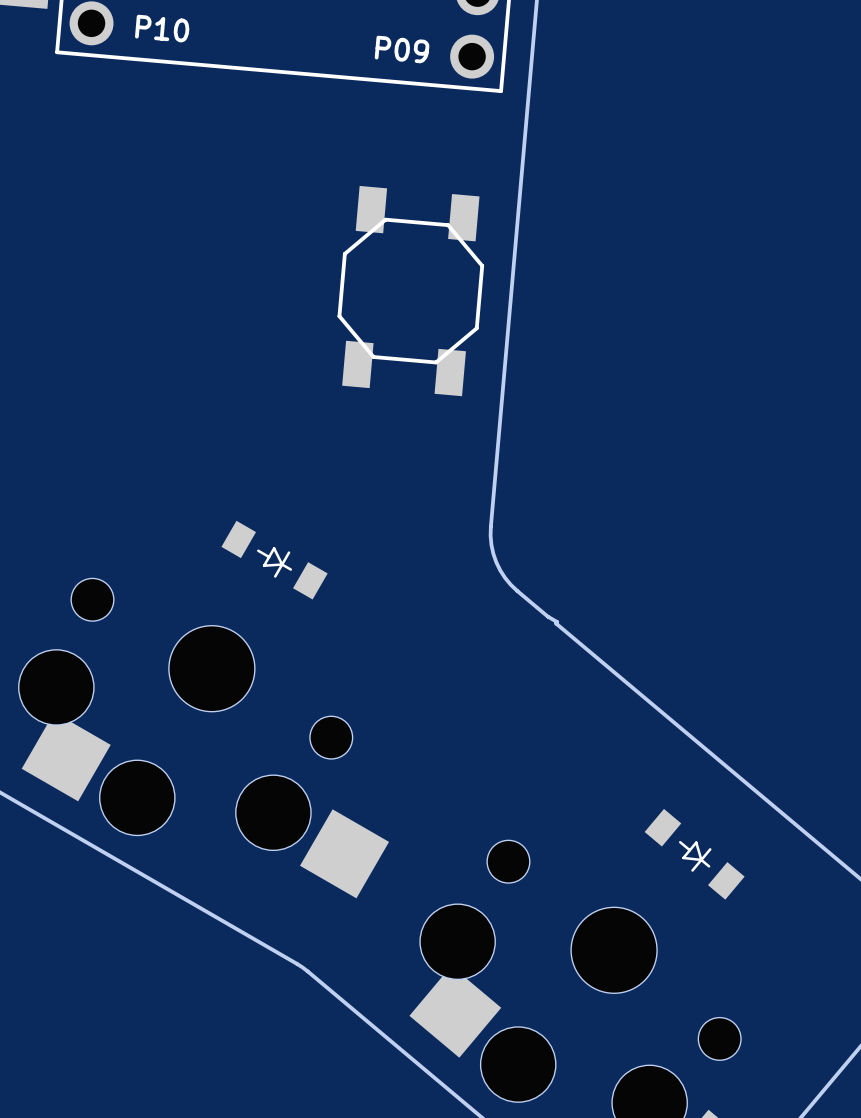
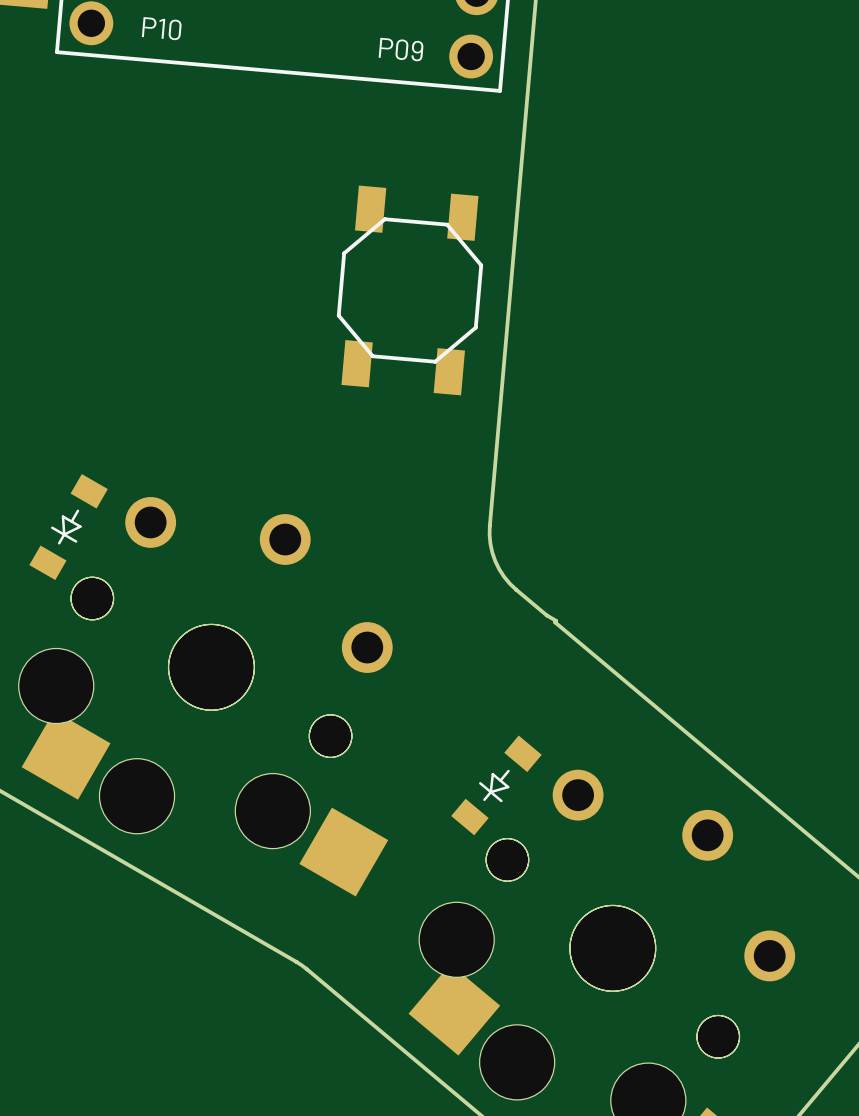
part rotation: 0° (274, 560) -> 90° clockwise (68, 527)
part position: (274, 560) -> (68, 527)
part: none -> (231, 627)
part rotation: 0° (694, 854) -> 90° clockwise (496, 785)
part position: (694, 854) -> (496, 785)
part: none -> (640, 913)

